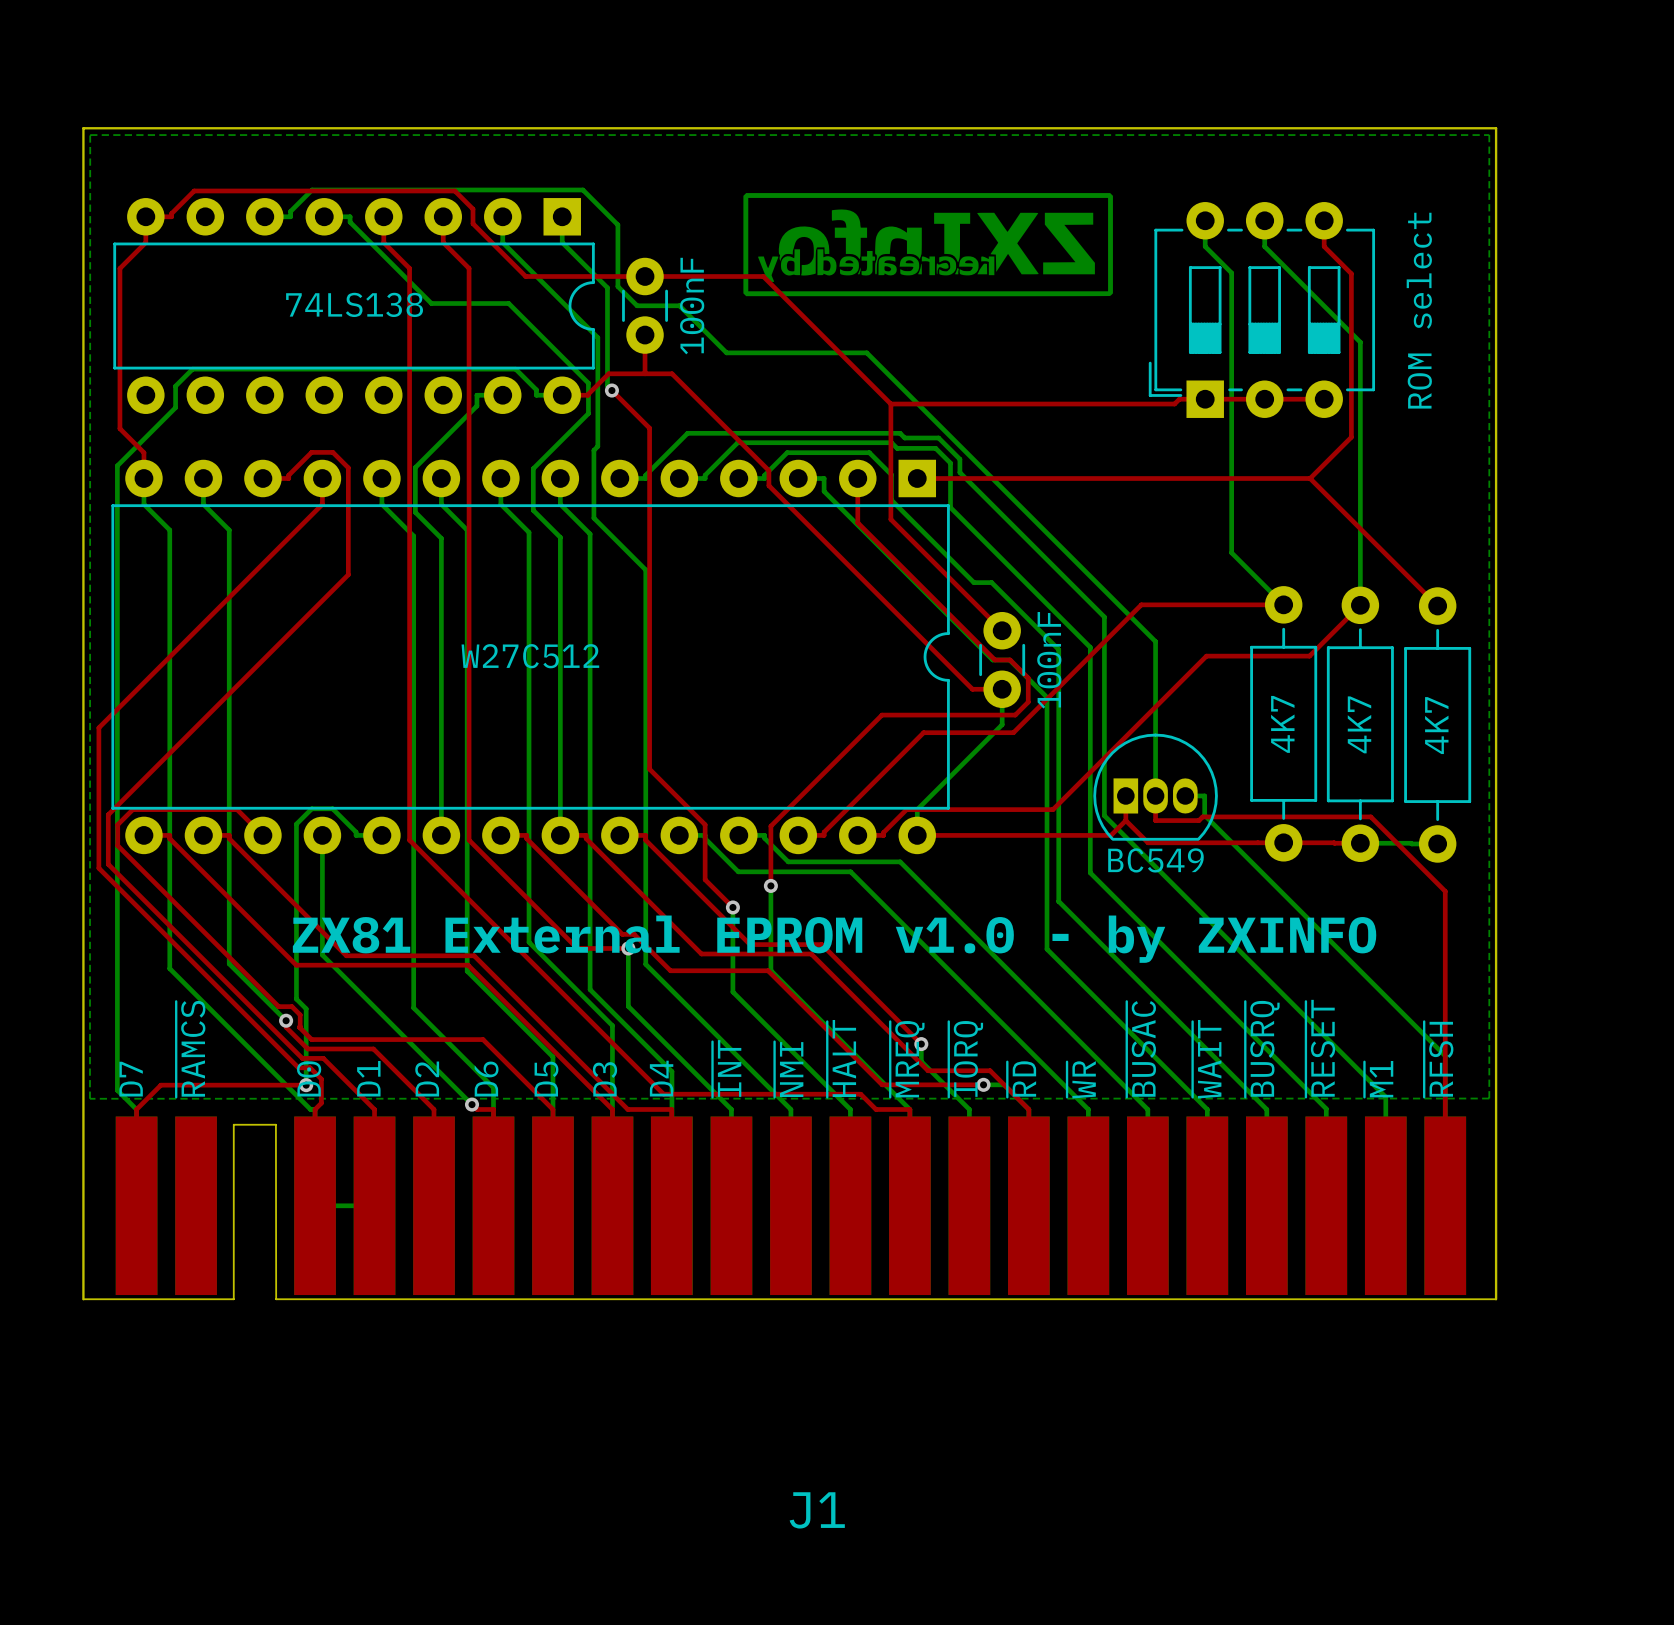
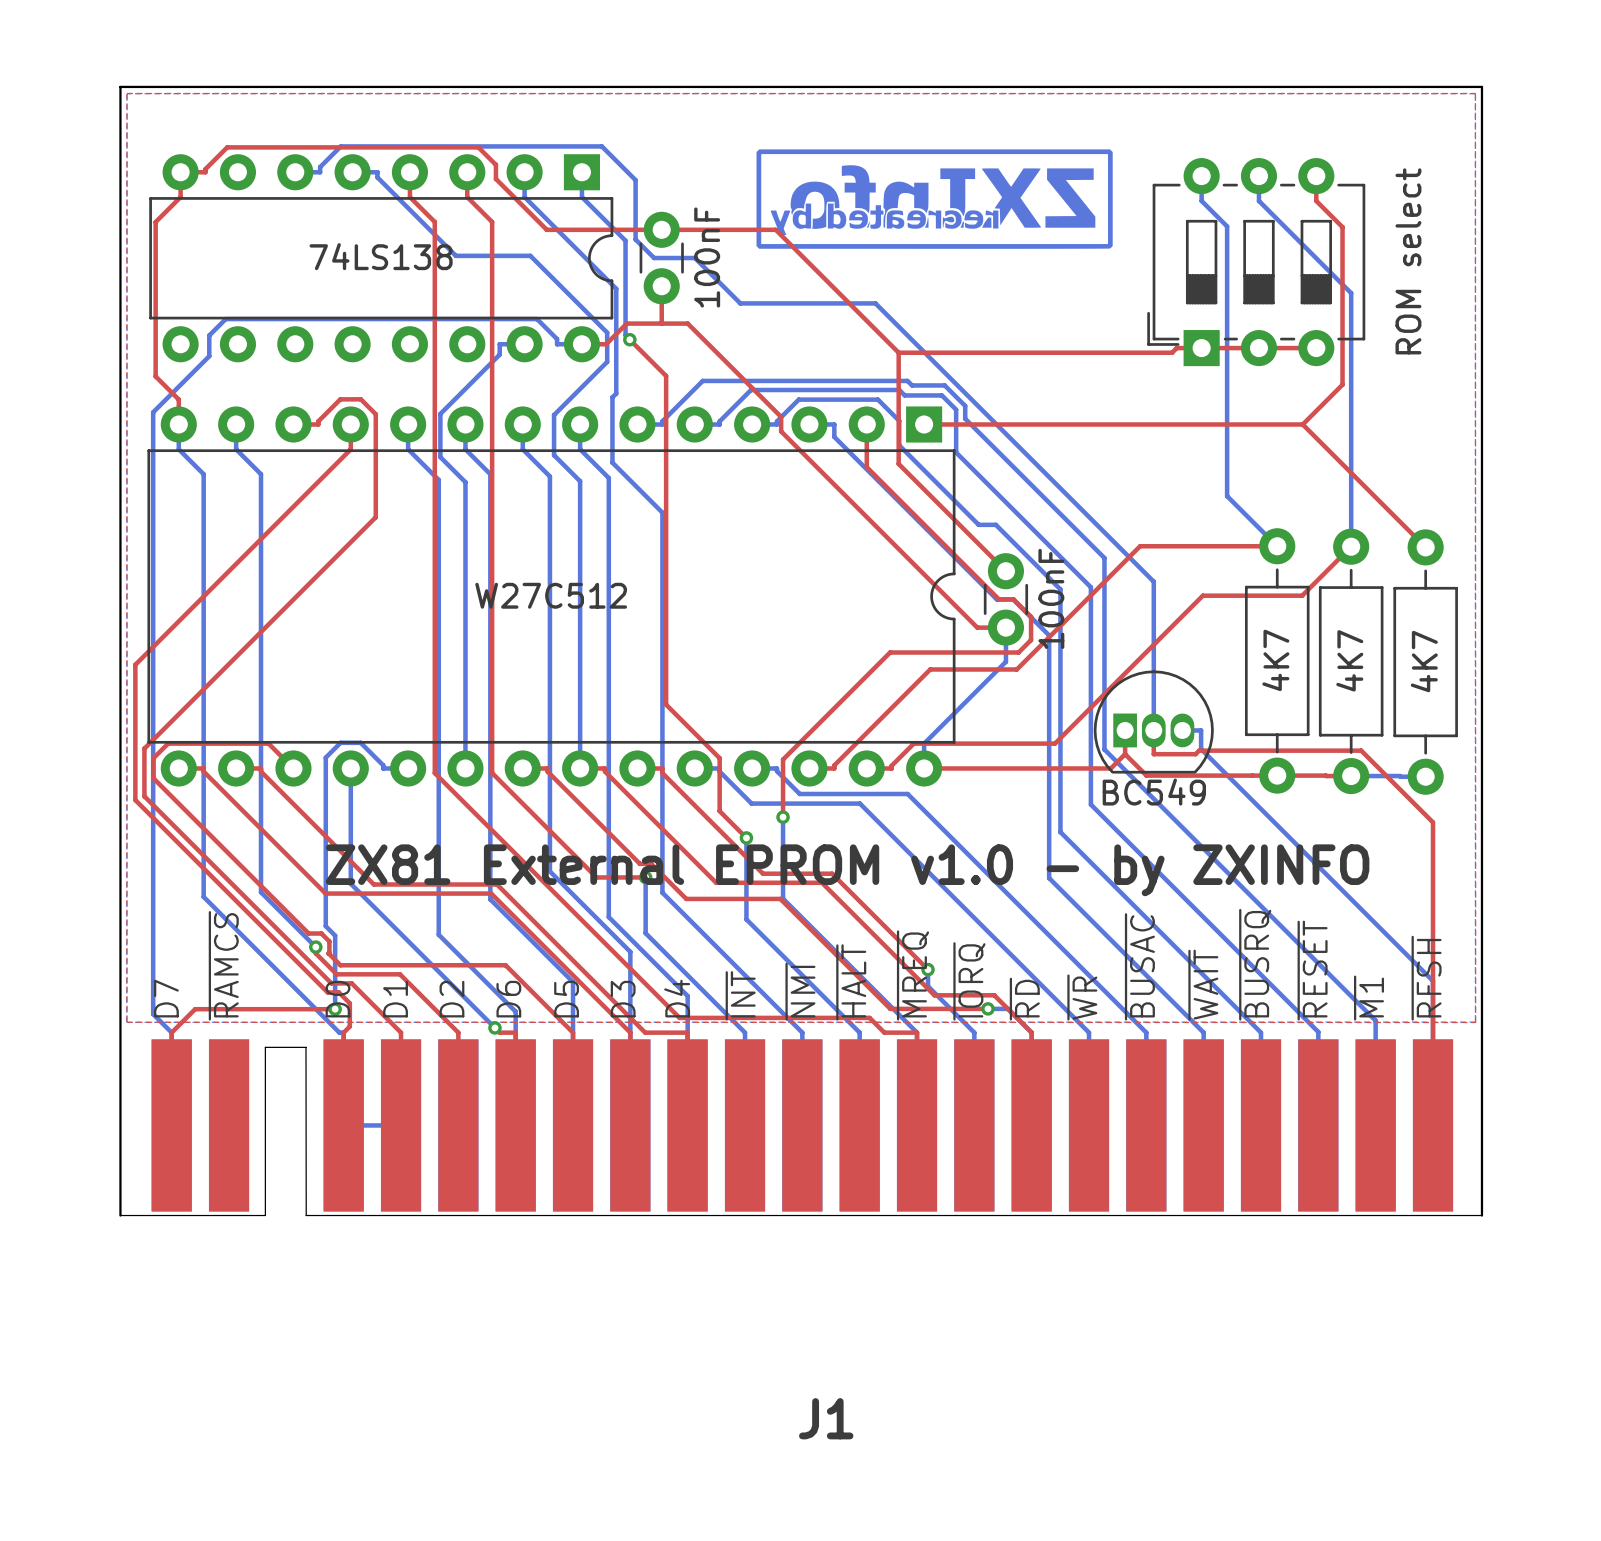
top zone outline: none -> (127, 93) (1475, 93) (1475, 1022) (127, 1022) (127, 93)

